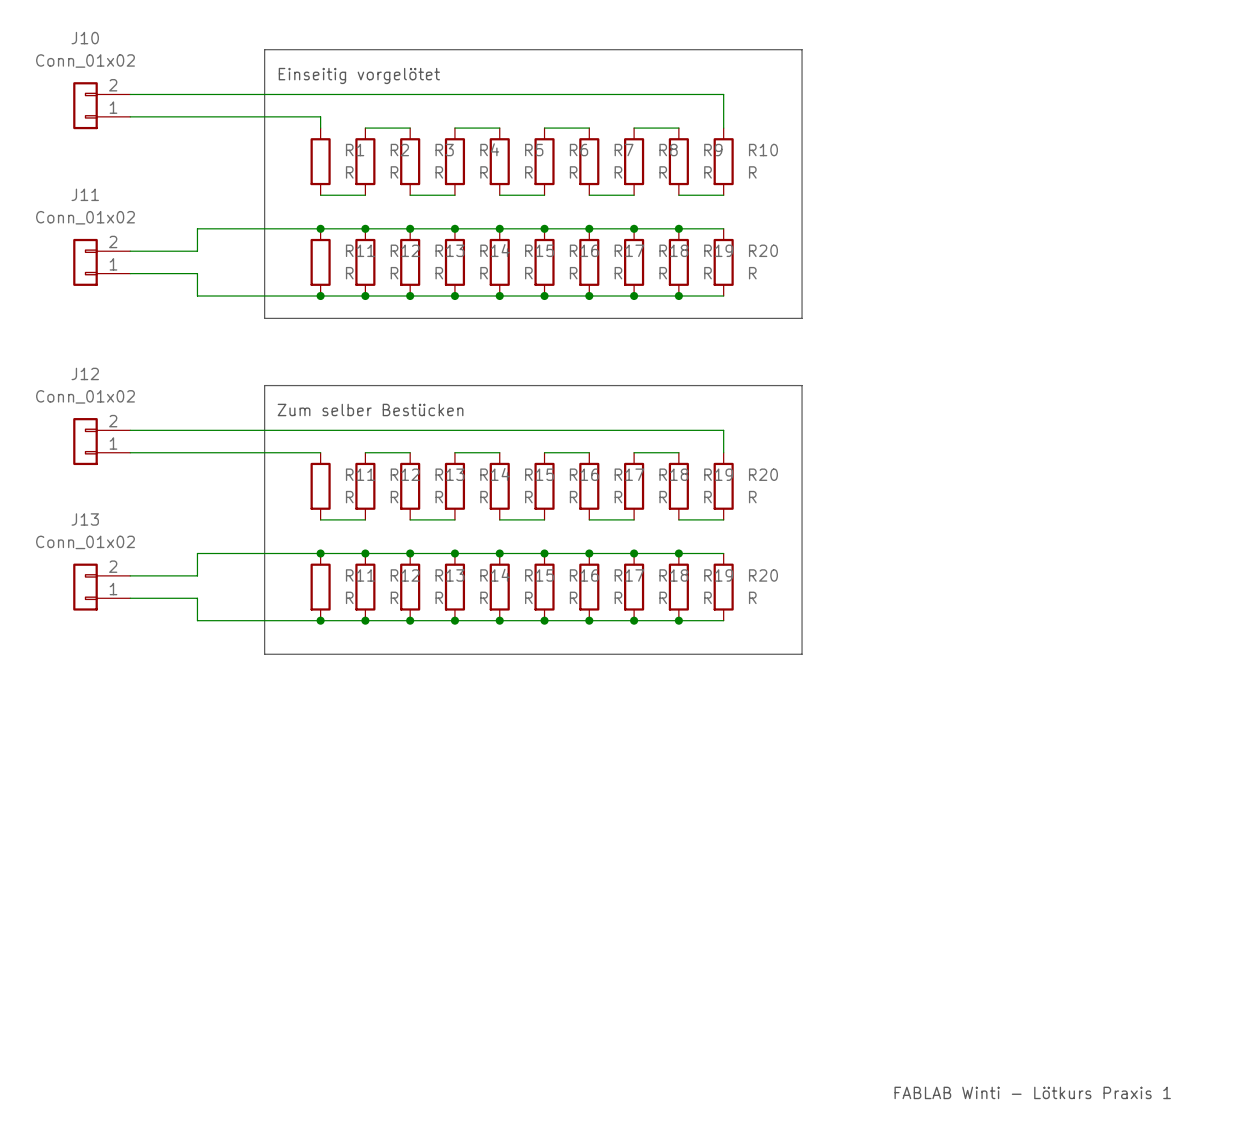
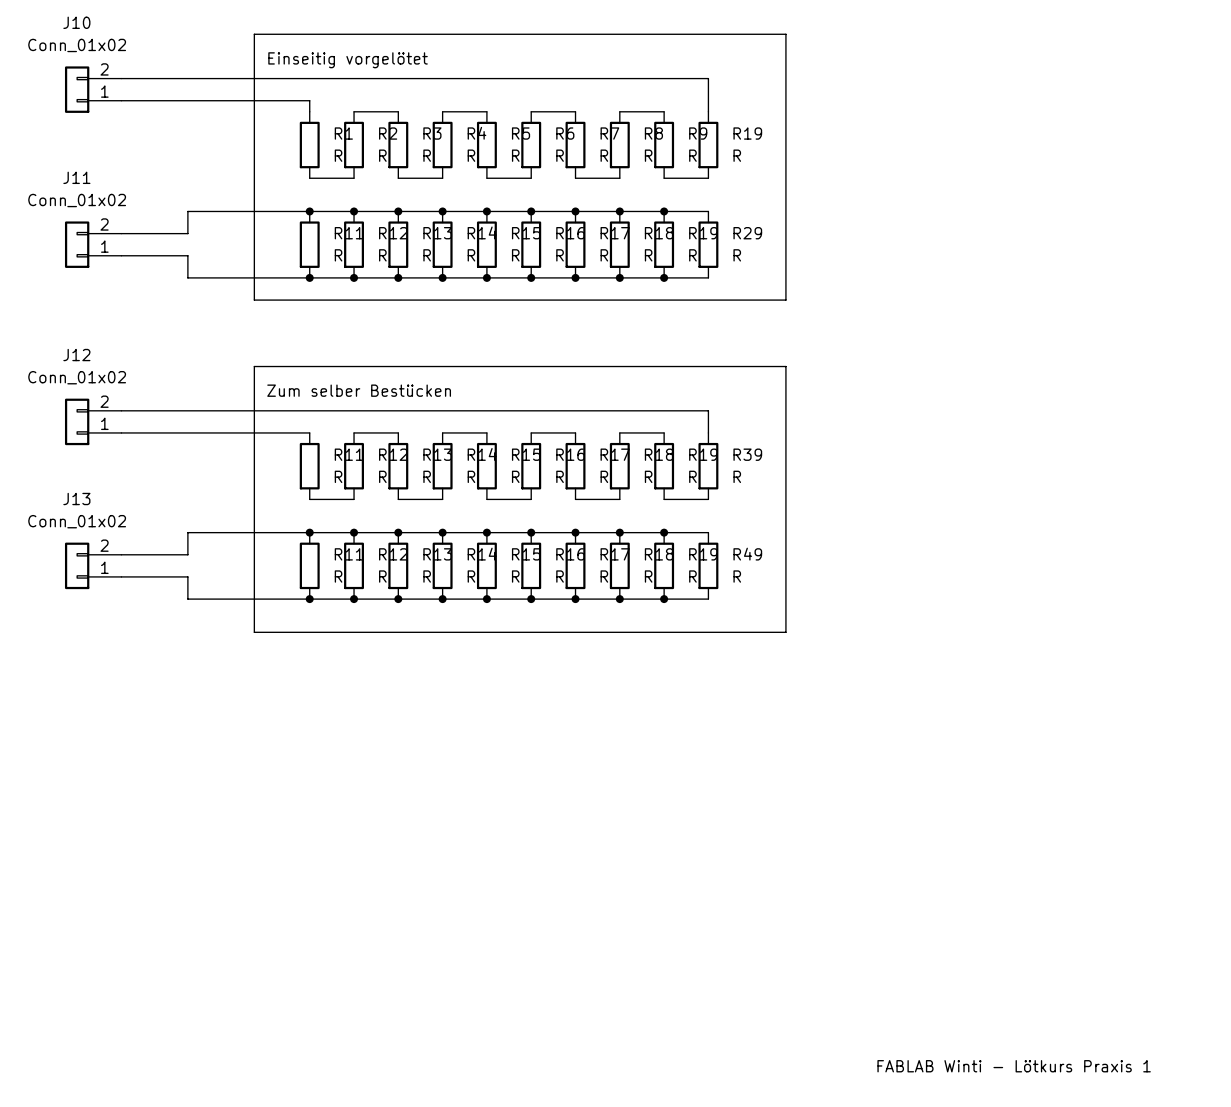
R10 name: R10 (763, 150) -> R19 (747, 133)
R20 name: R20 (763, 250) -> R29 (747, 233)
R20 name: R20 (763, 474) -> R39 (747, 454)
R20 name: R20 (763, 575) -> R49 (747, 554)

